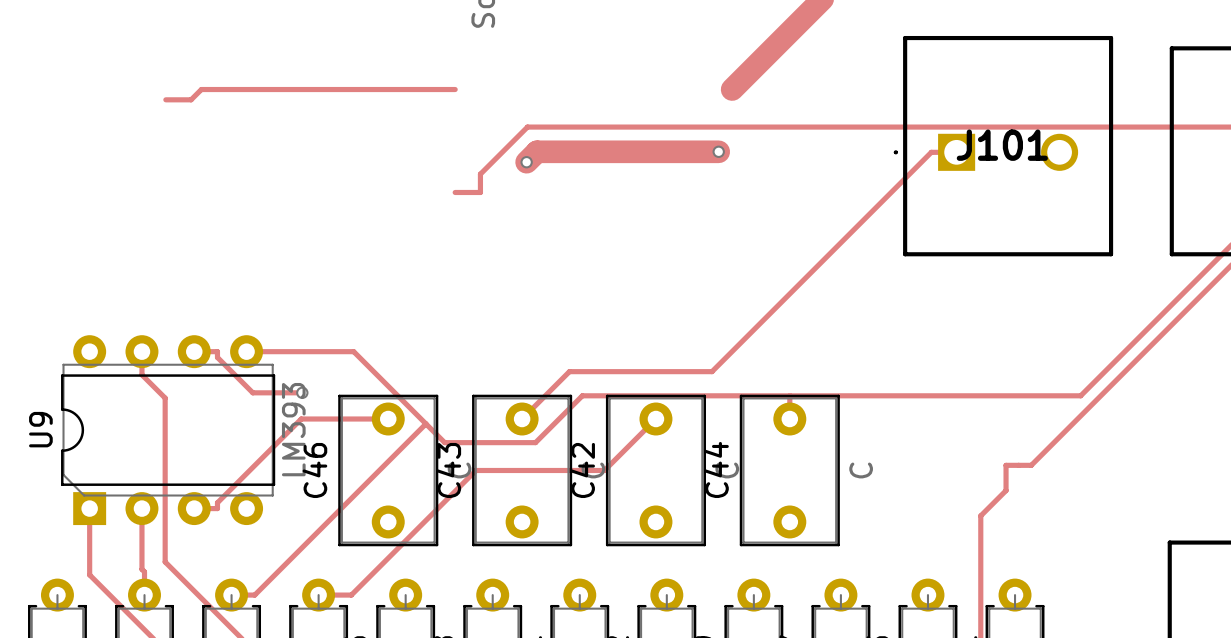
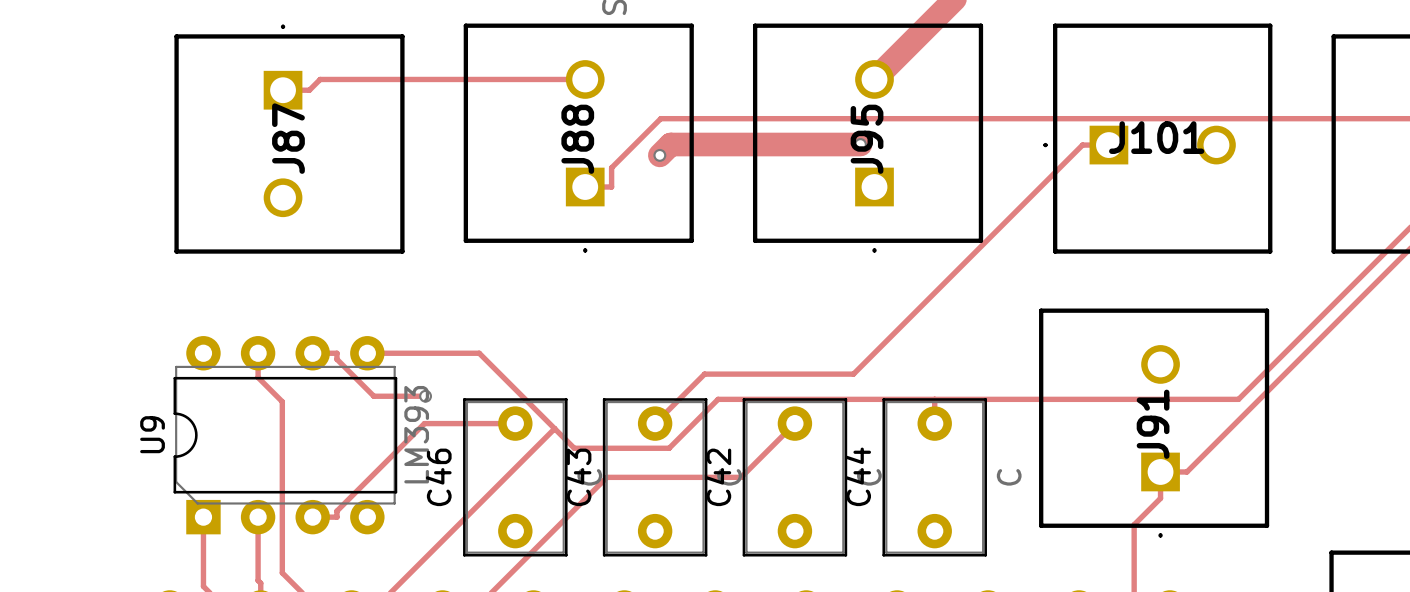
J88: none -> (578, 138)
J95: none -> (868, 138)
J87: none -> (289, 139)
J91: none -> (1154, 423)

